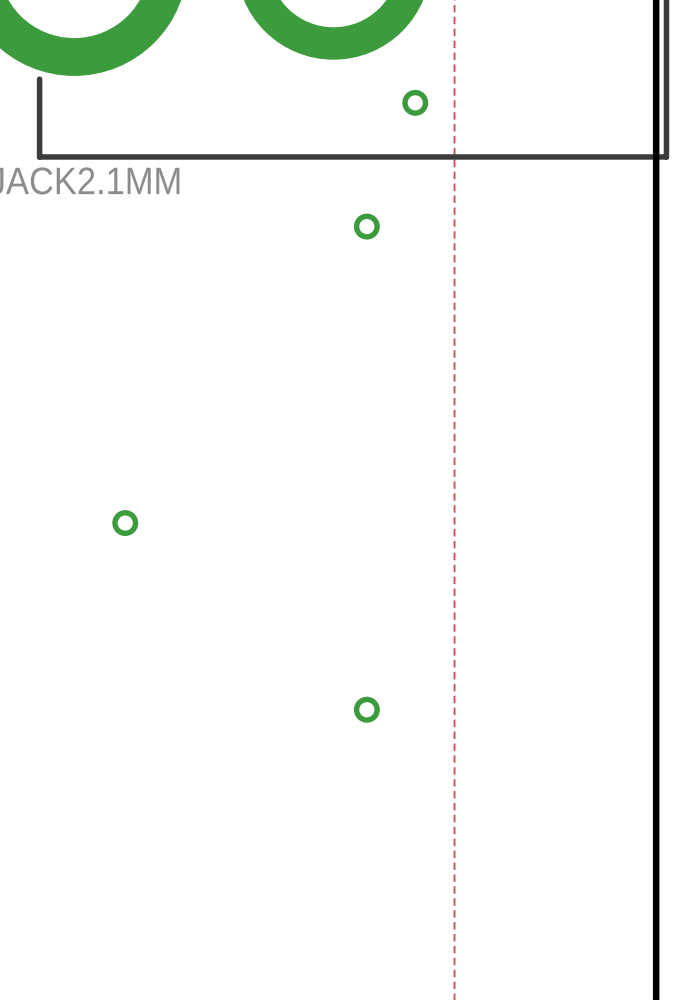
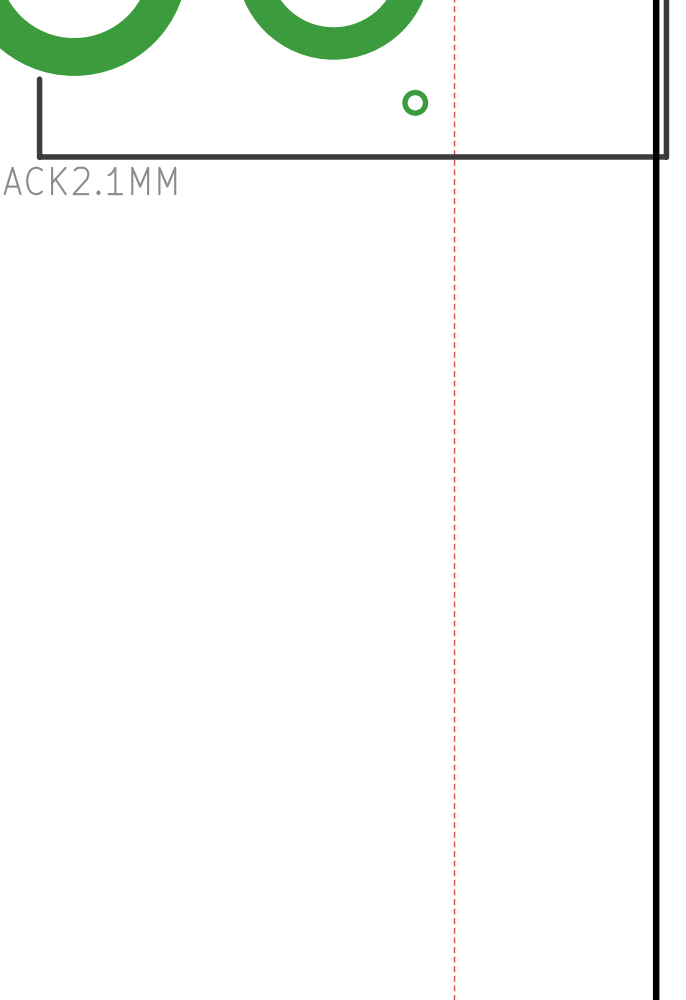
via: (366, 226) -> none
via: (125, 523) -> none
via: (366, 709) -> none

